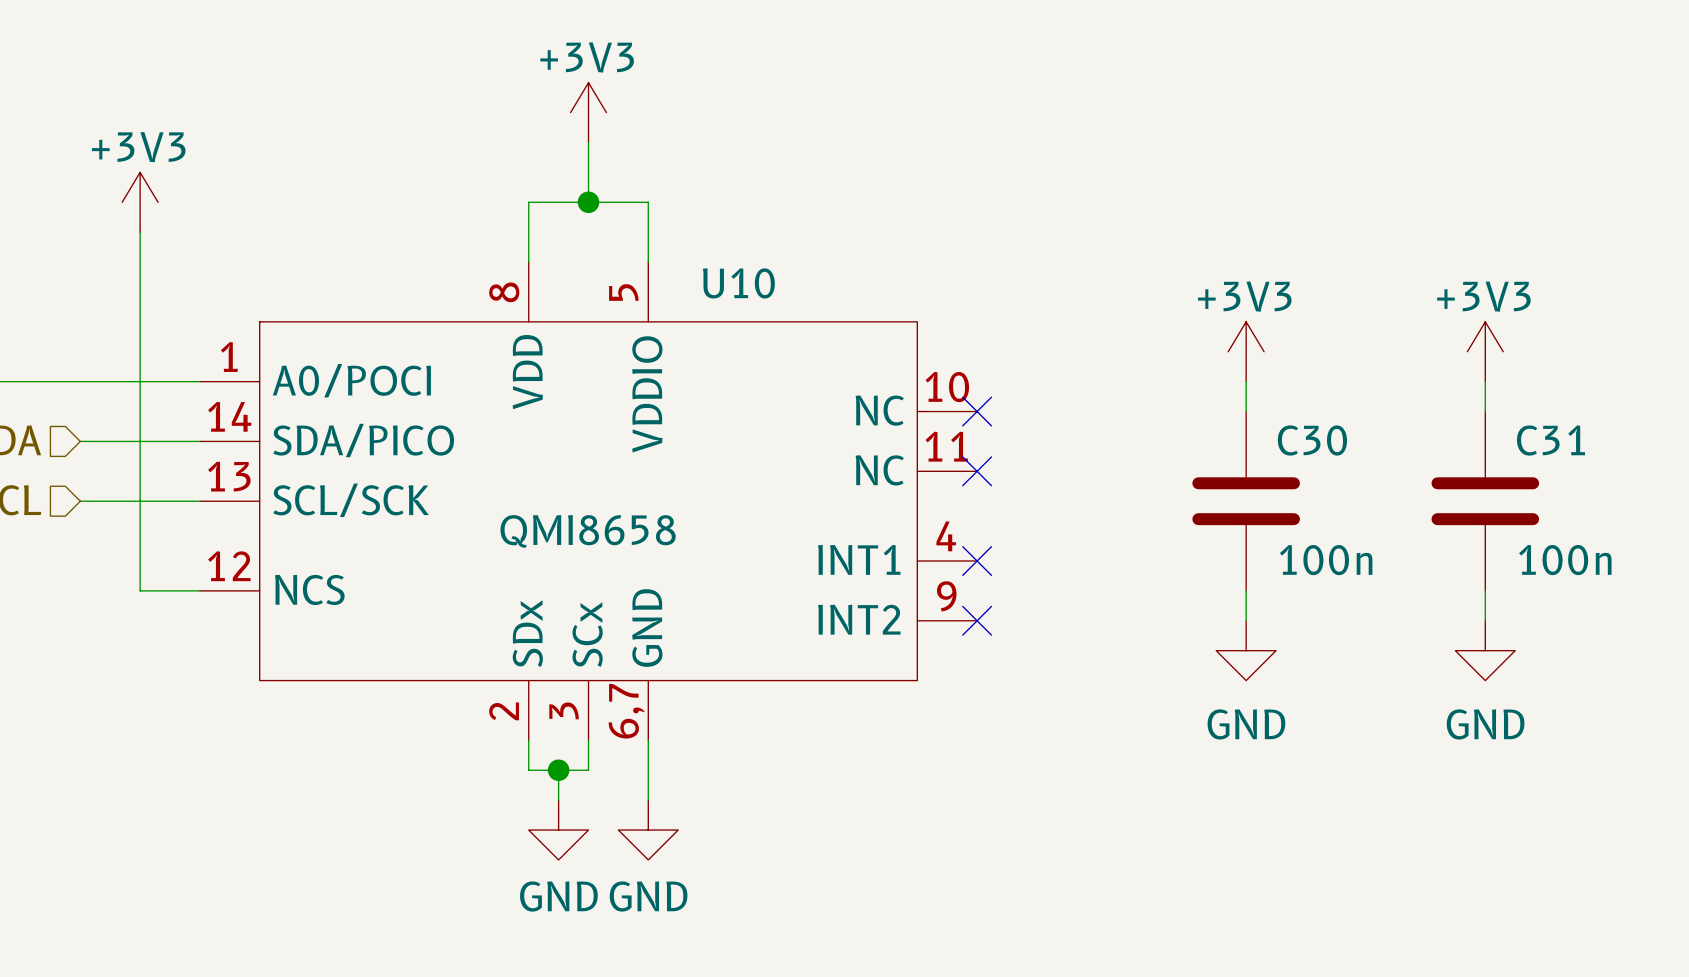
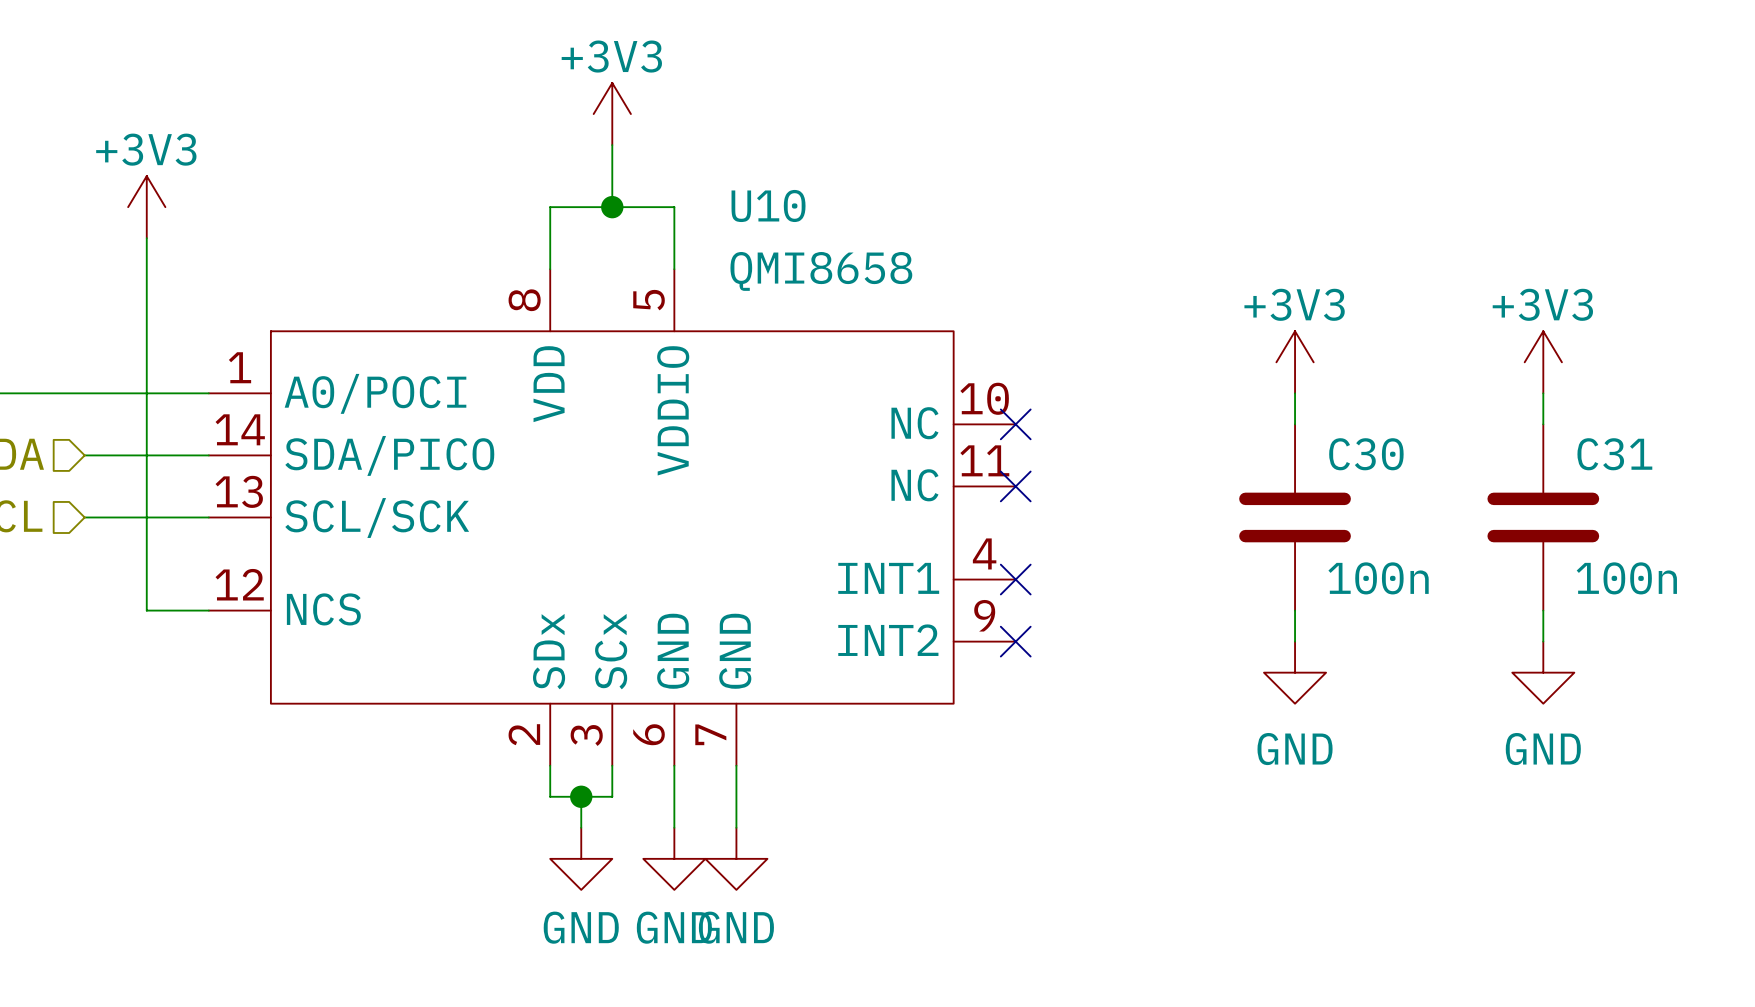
U10 symbol: [199, 262, 978, 741] -> [208, 269, 1016, 766]
U10 name position: U10 (738, 283) -> U10 (768, 205)
U10 value position: QMI8658 (588, 531) -> QMI8658 (821, 271)
wire: none -> (736, 765) (736, 827)
power symbol: none -> GND (736, 858)

